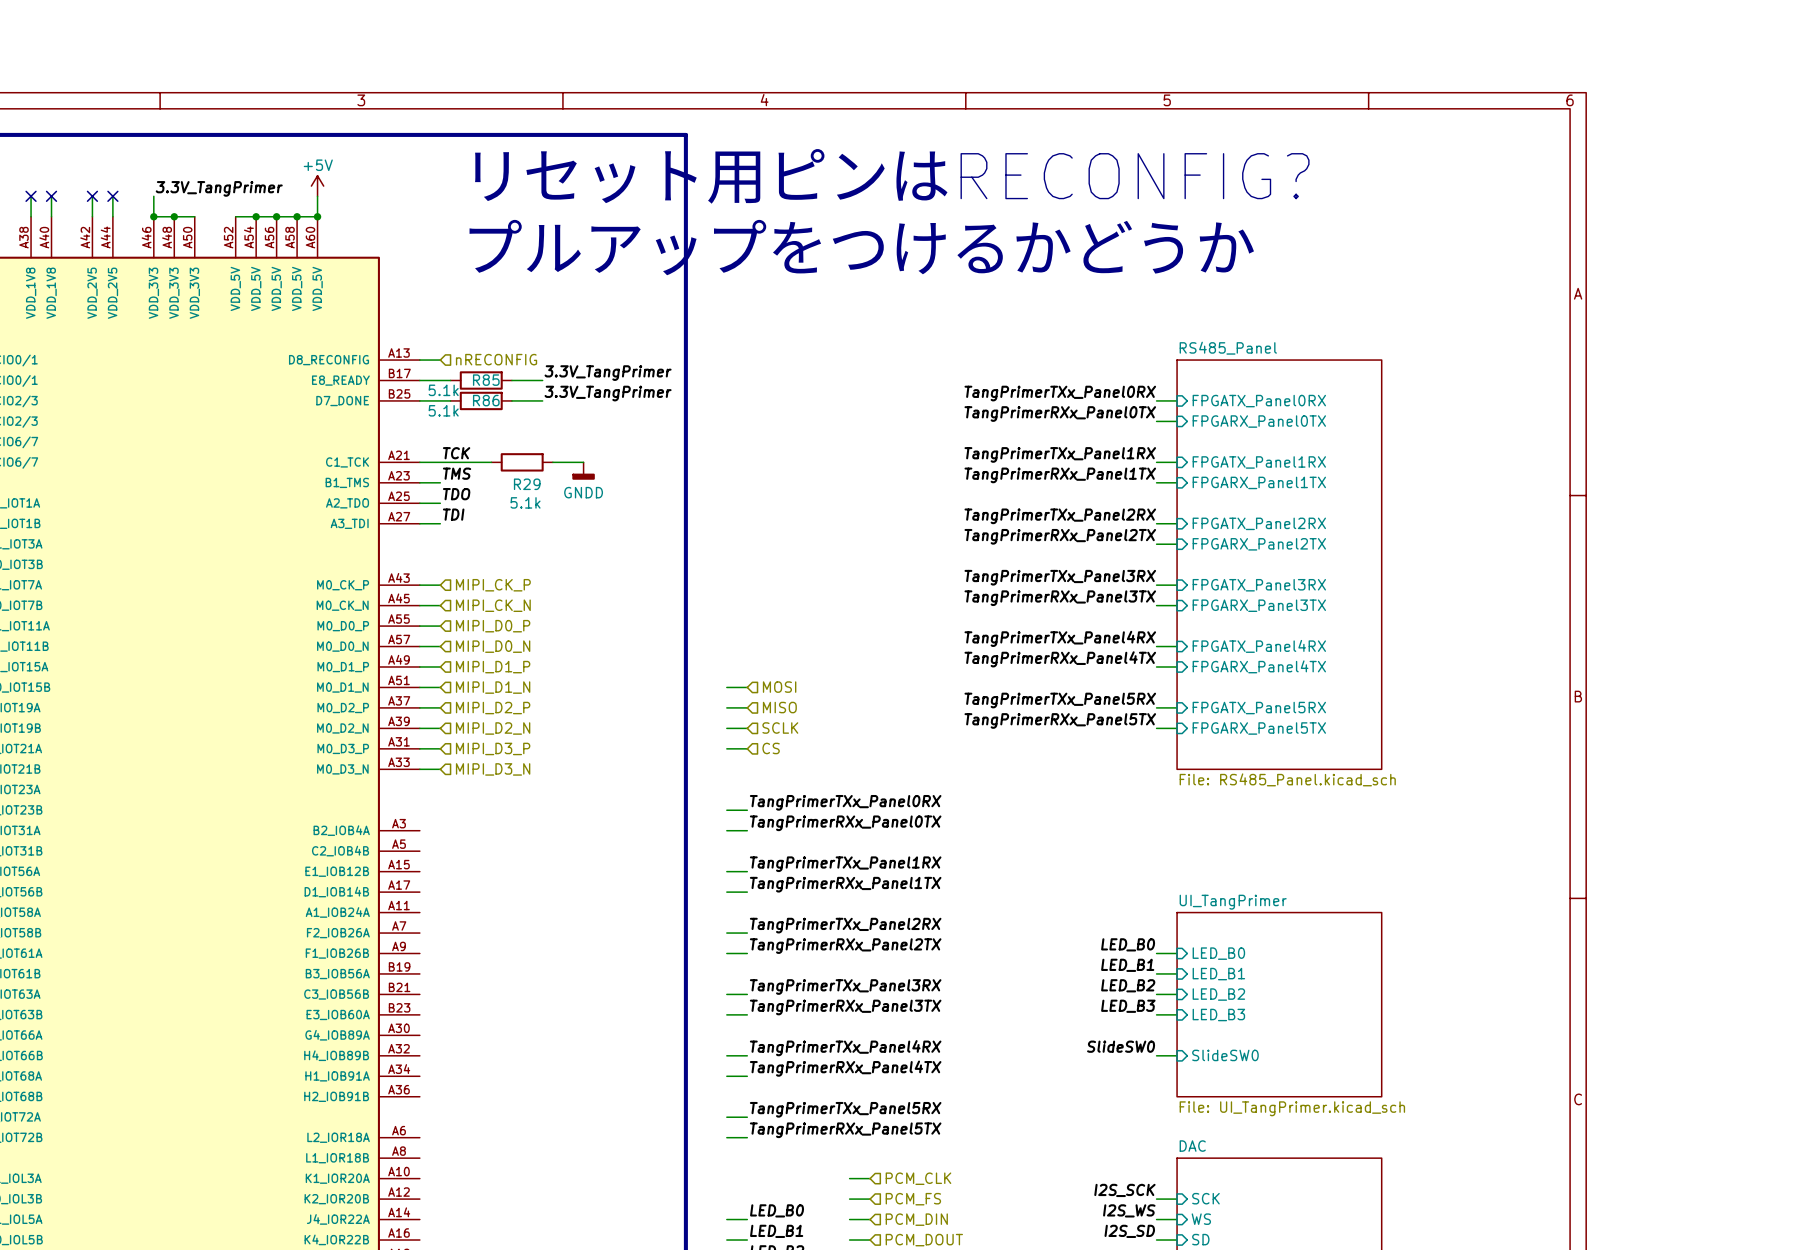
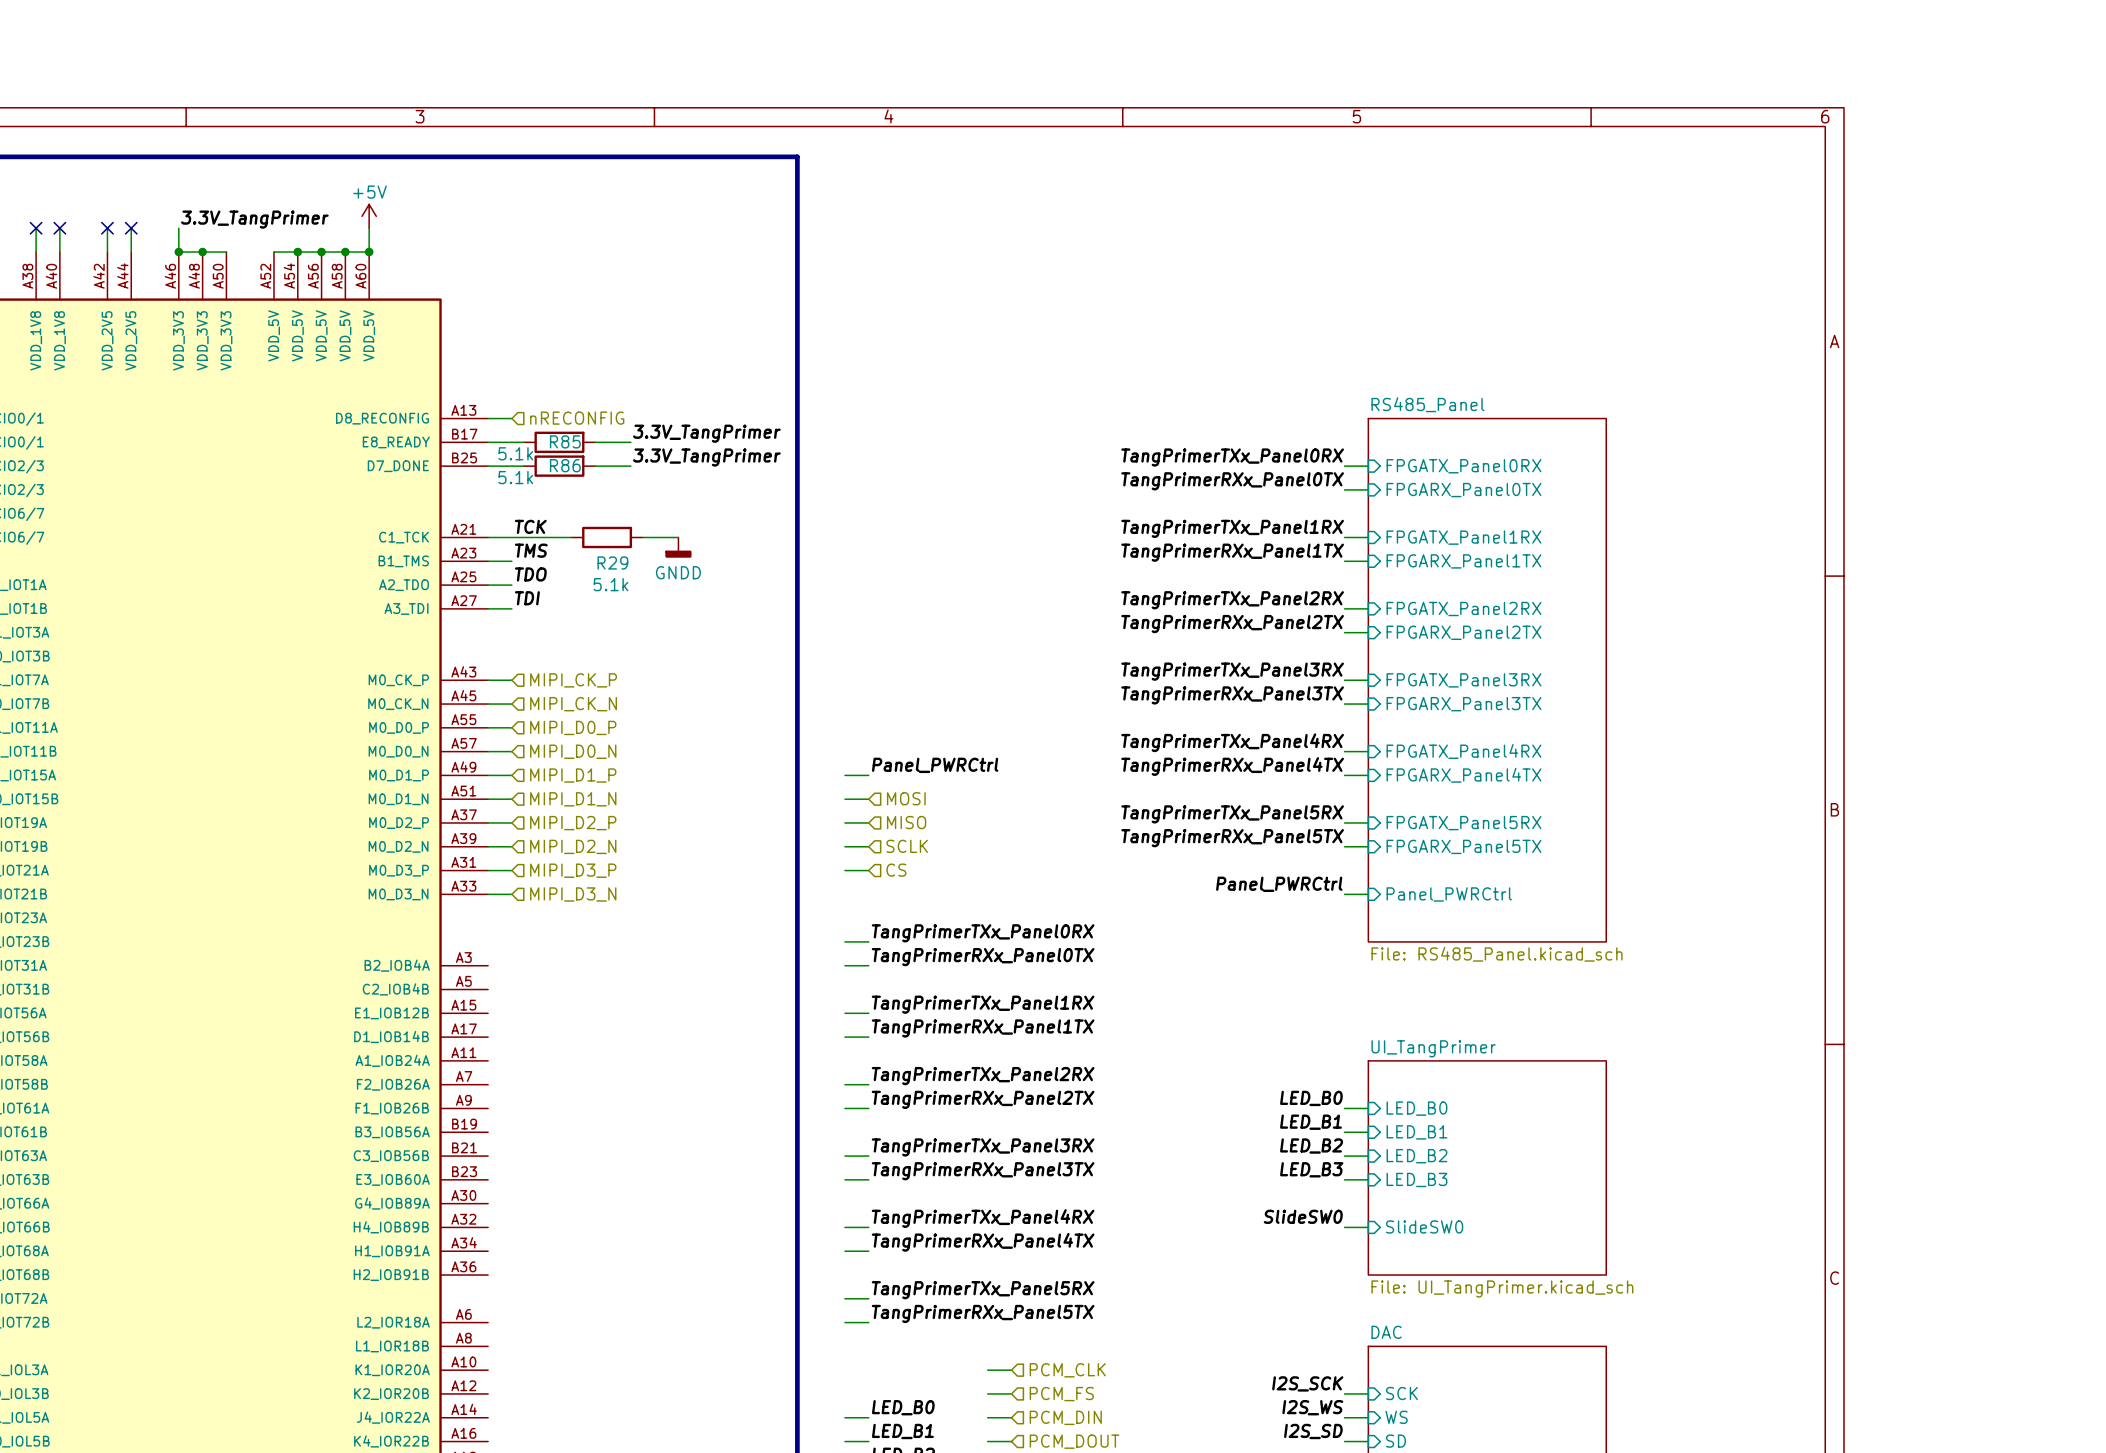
text: リセット用ピンはRECONFIG? (891, 176) -> none
text: プルアップをつけるかどうか (861, 247) -> none
sheet RS485_Panel shape: [1176, 359, 1383, 770] -> [1367, 417, 1607, 943]
label: none -> Panel_PWRCtrl (935, 765)
wire: none -> (844, 775) (868, 775)
label: none -> Panel_PWRCtrl (1279, 884)
wire: none -> (1344, 894) (1368, 894)
sheet pin: none -> Panel_PWRCtrl (1449, 894)
sheet RS485_Panel value position: File: RS485_Panel.kicad_sch (1287, 779) -> File: RS485_Panel.kicad_sch (1497, 954)

